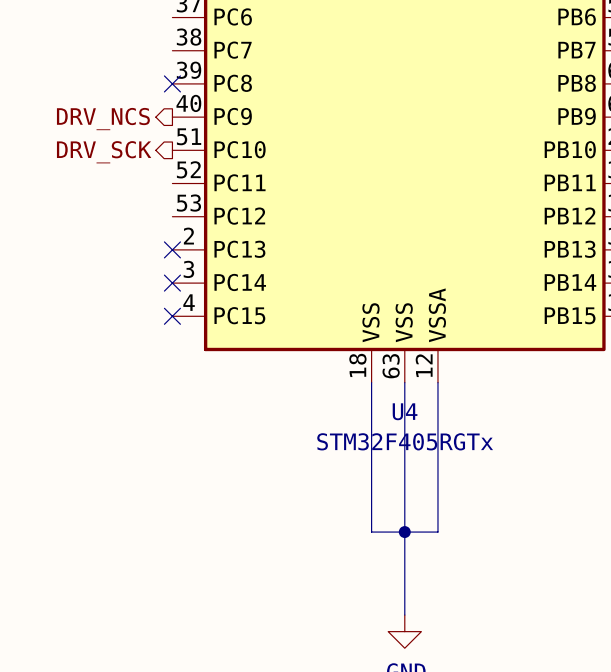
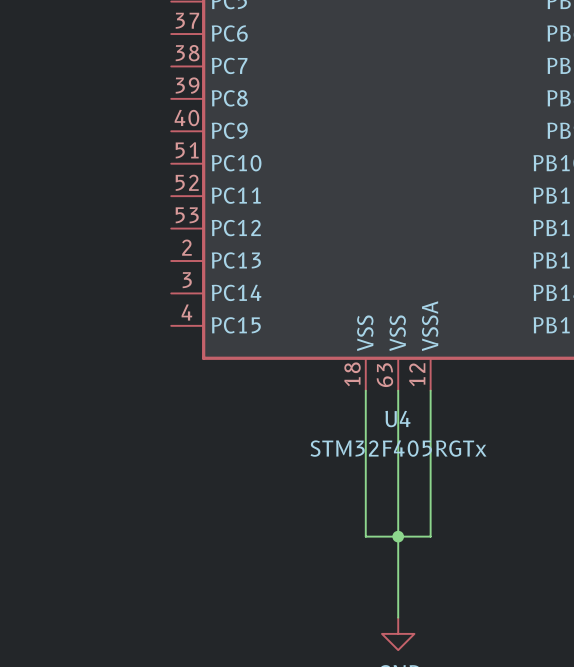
no-connect mark: (172, 83) -> none
hierarchical label: DRV_NCS (103, 119) -> none
hierarchical label: DRV_SCK (104, 152) -> none
no-connect mark: (172, 249) -> none
no-connect mark: (172, 283) -> none
no-connect mark: (172, 316) -> none

